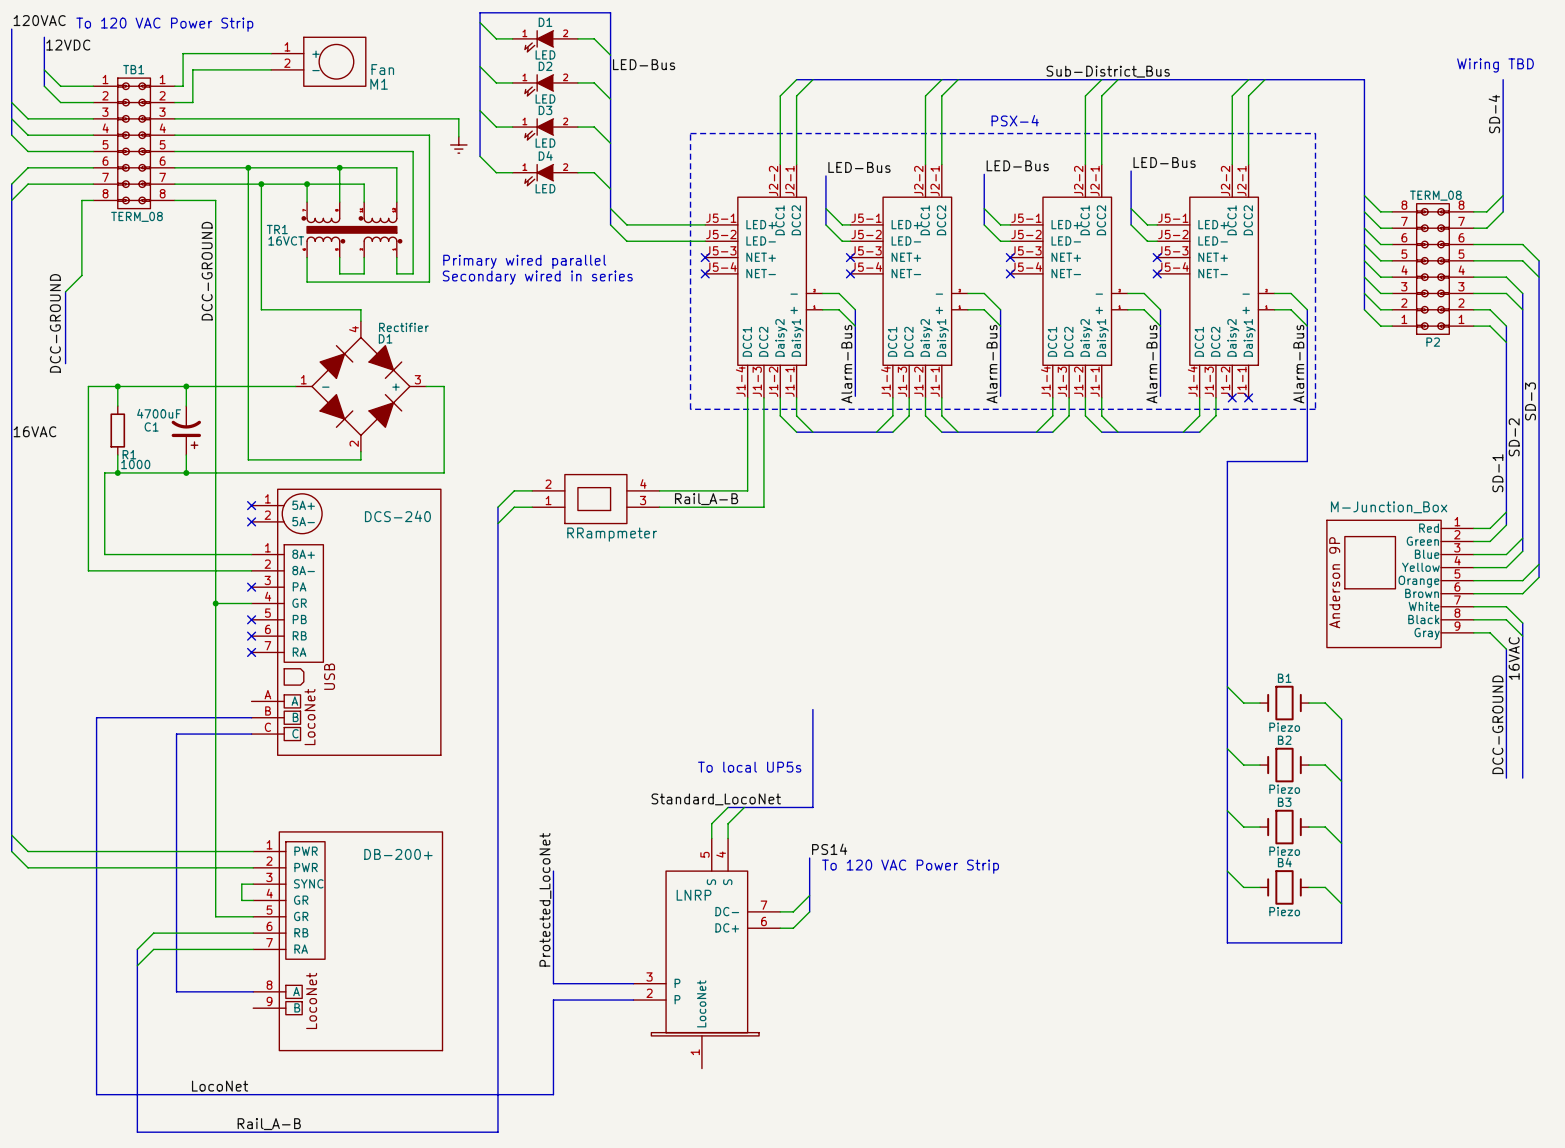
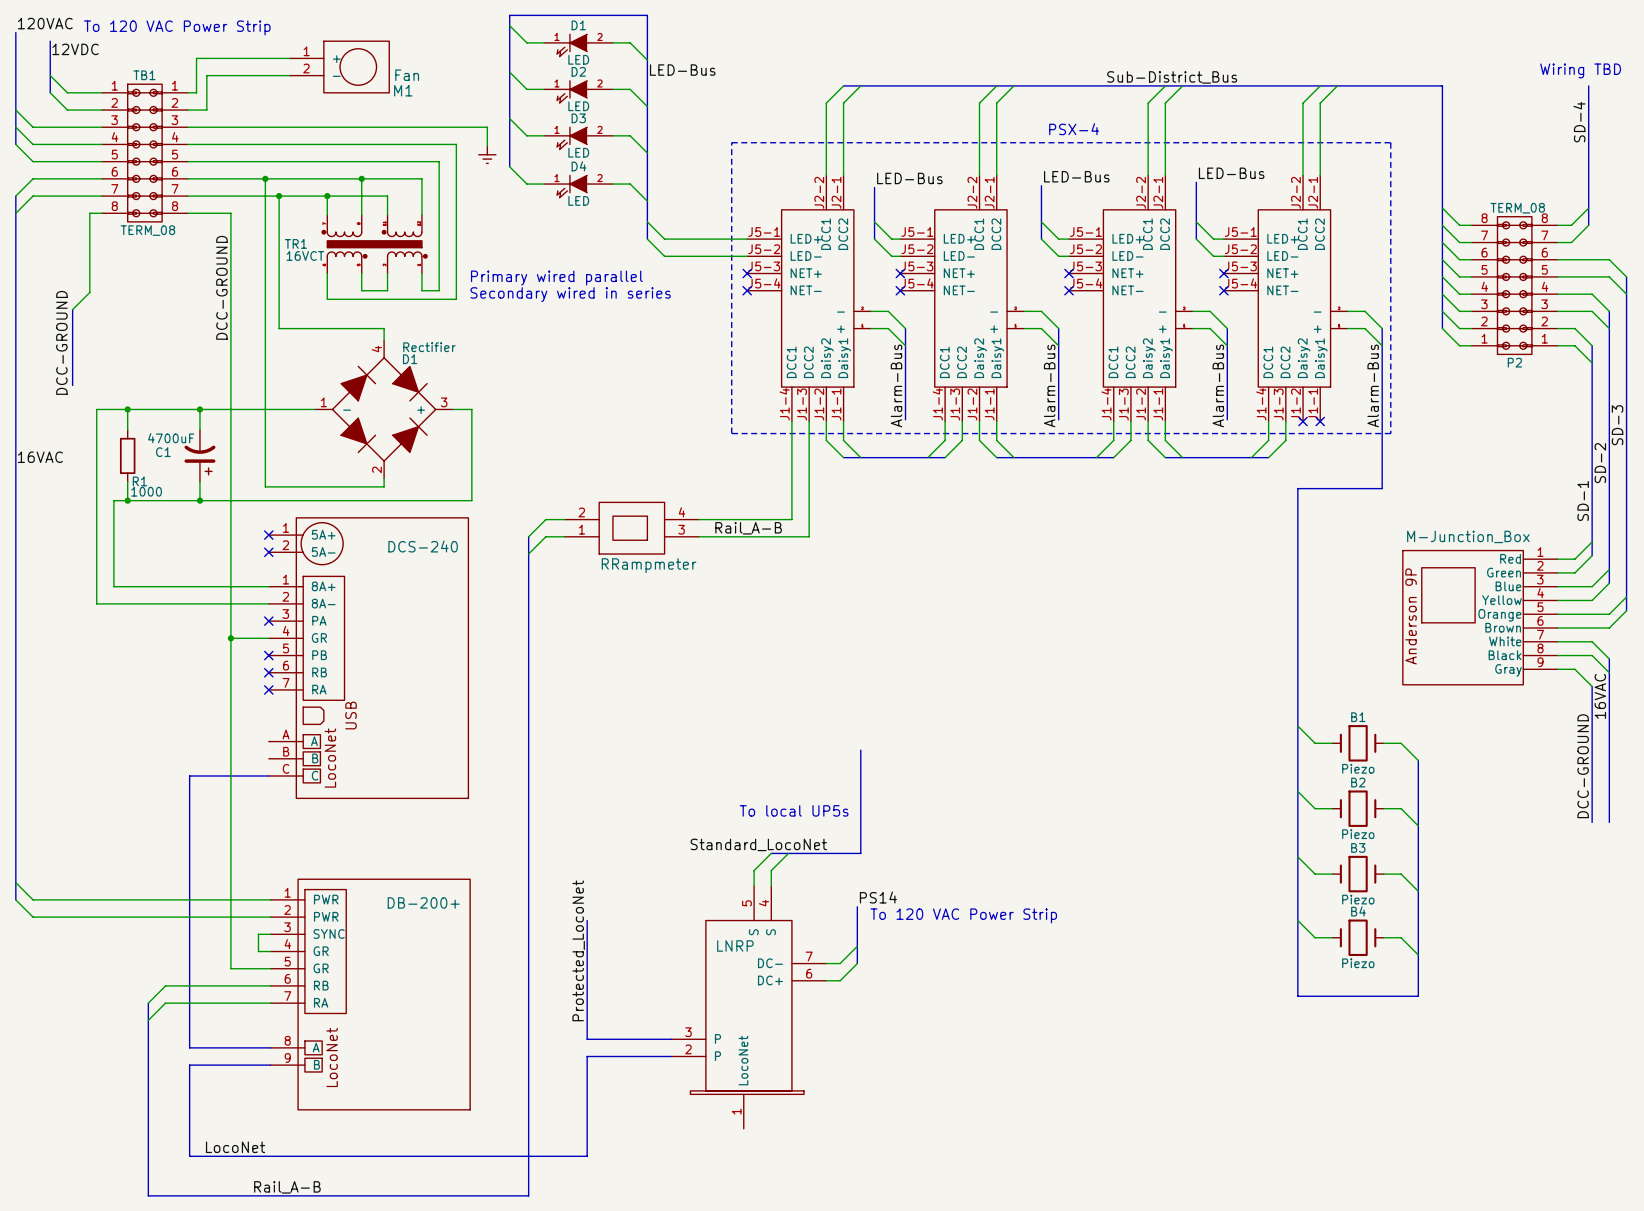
bus: (251, 717) (96, 717) (96, 1094) (176, 1094) -> (270, 1065) (189, 1065) (189, 1156)

